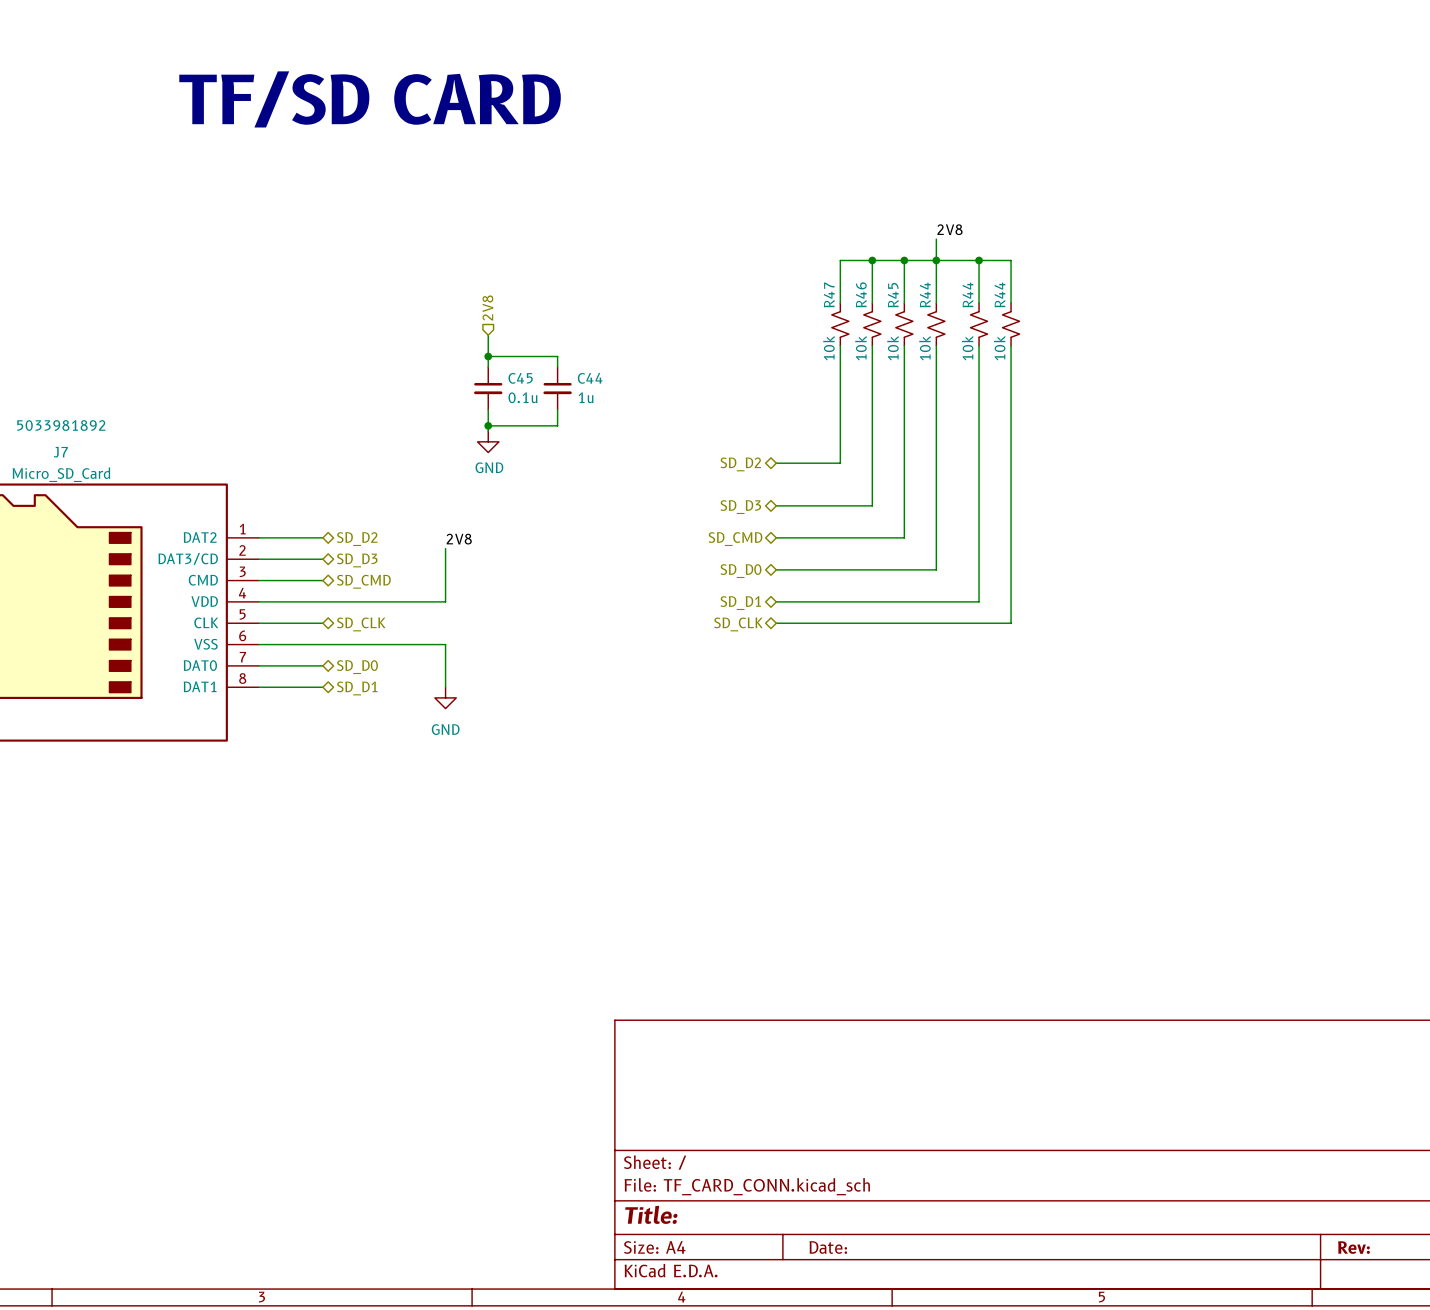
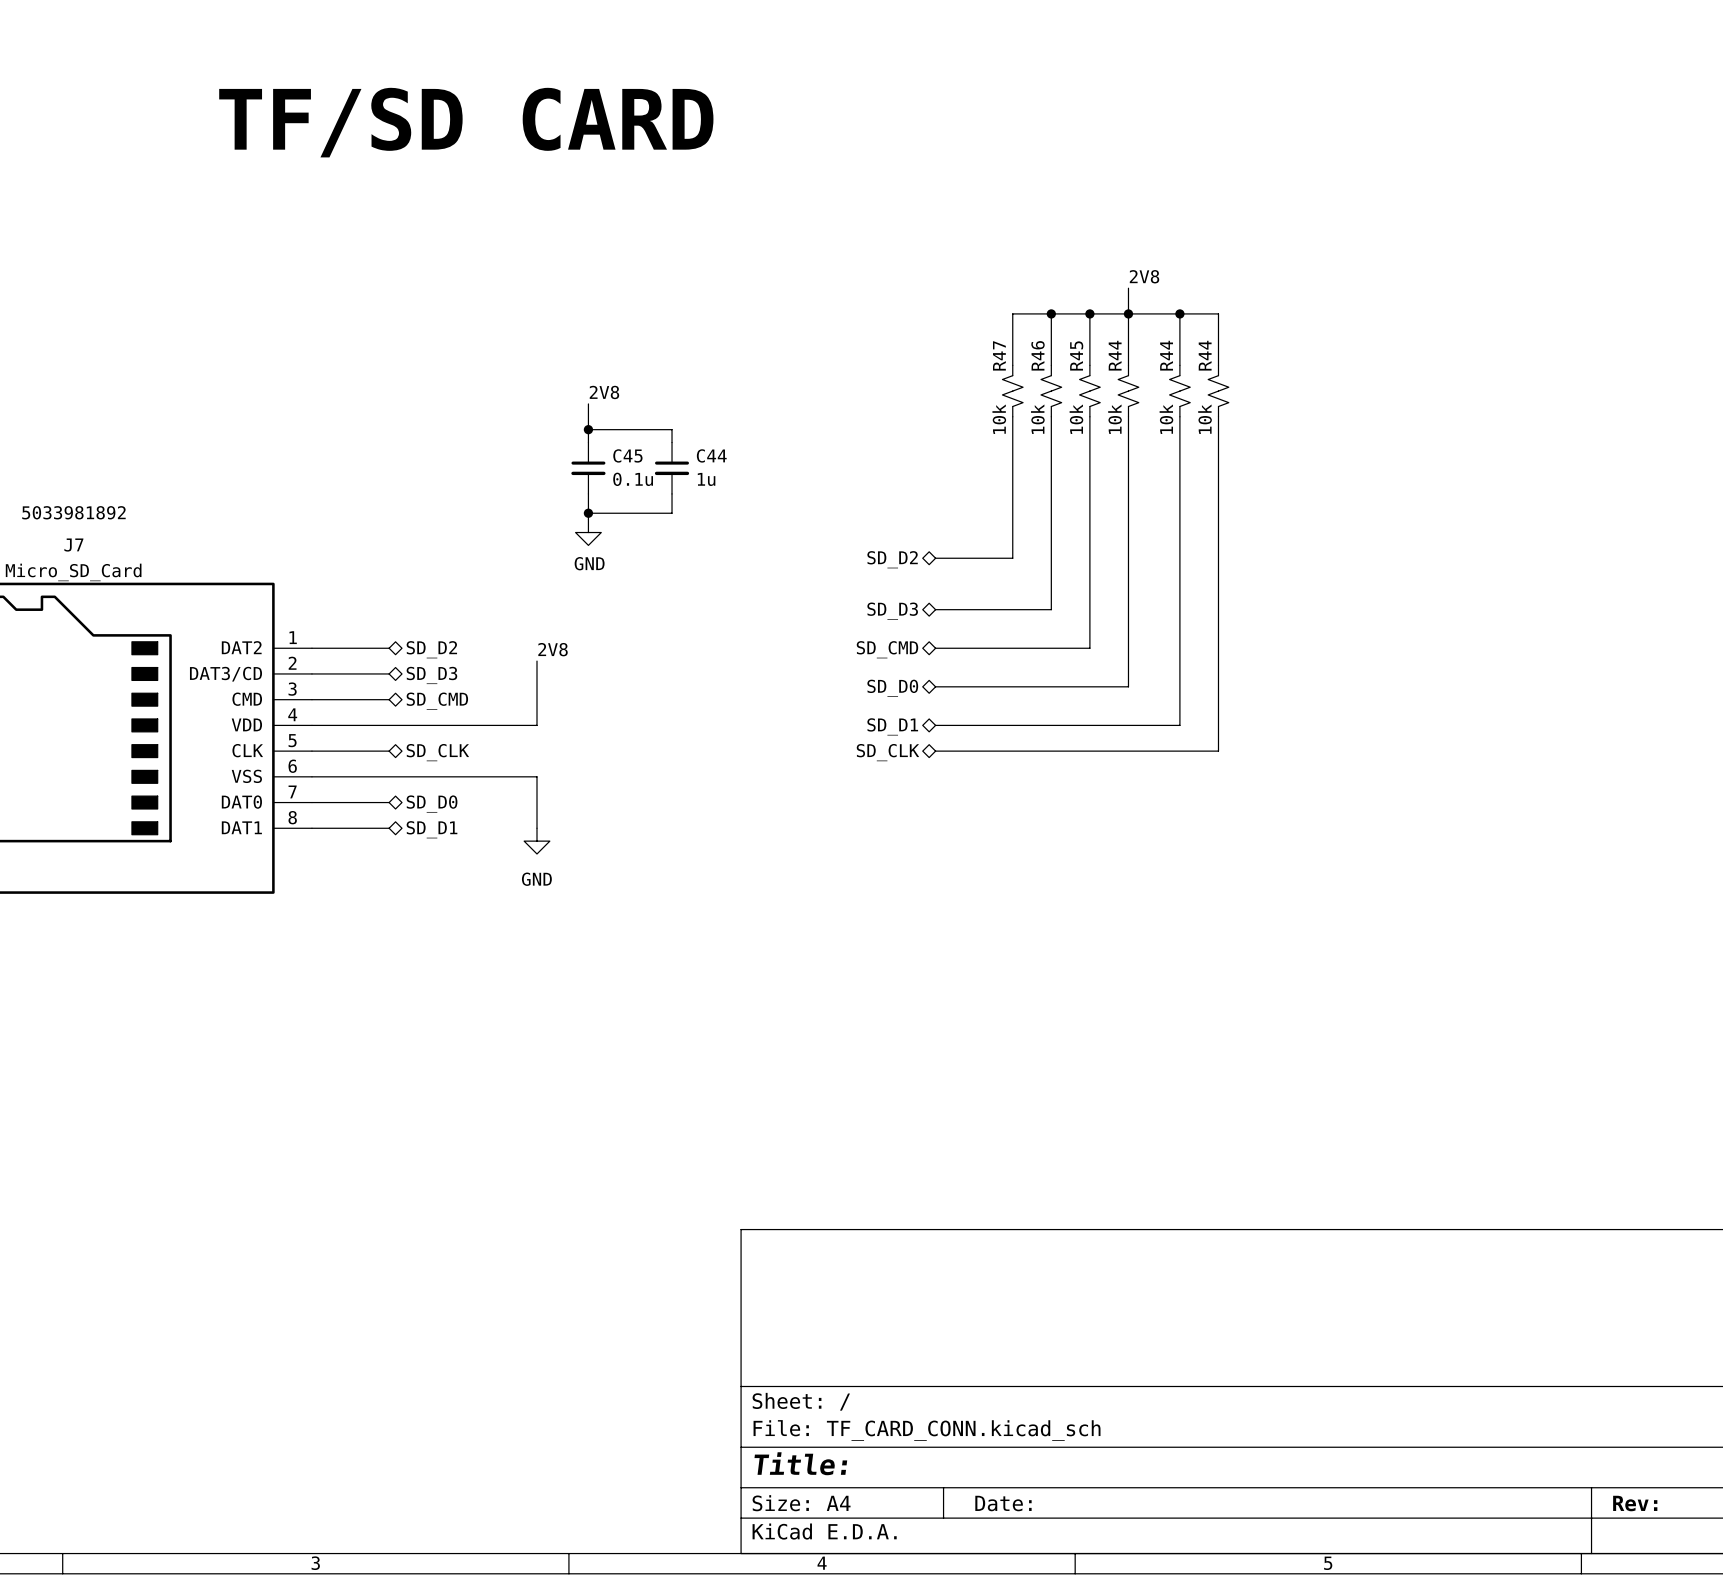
hierarchical label: 2V8 (487, 307) -> none
label: none -> 2V8 (604, 392)

